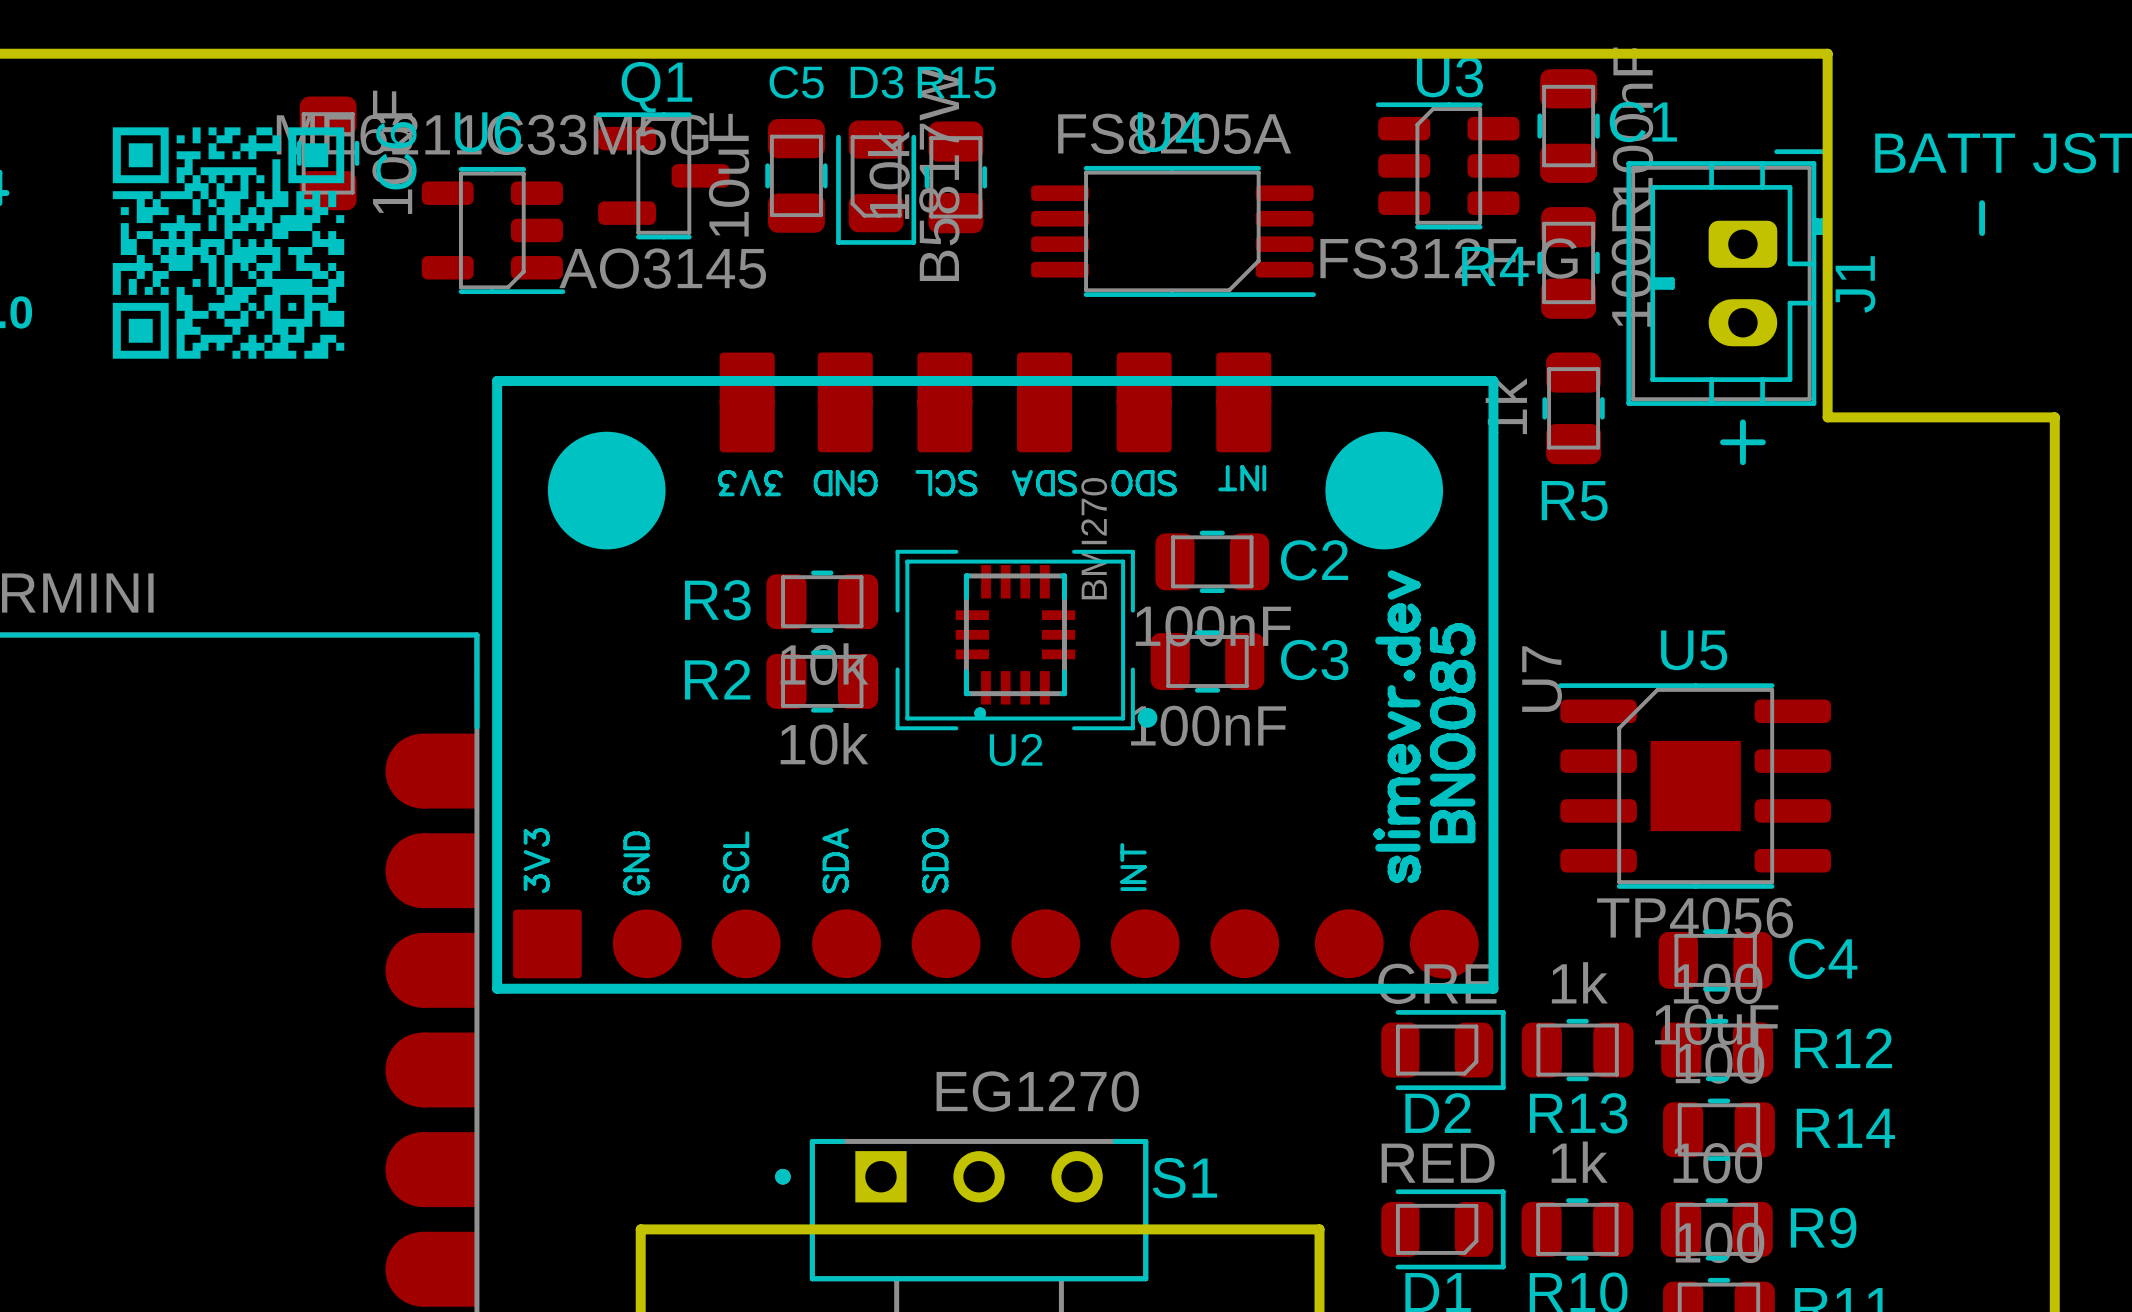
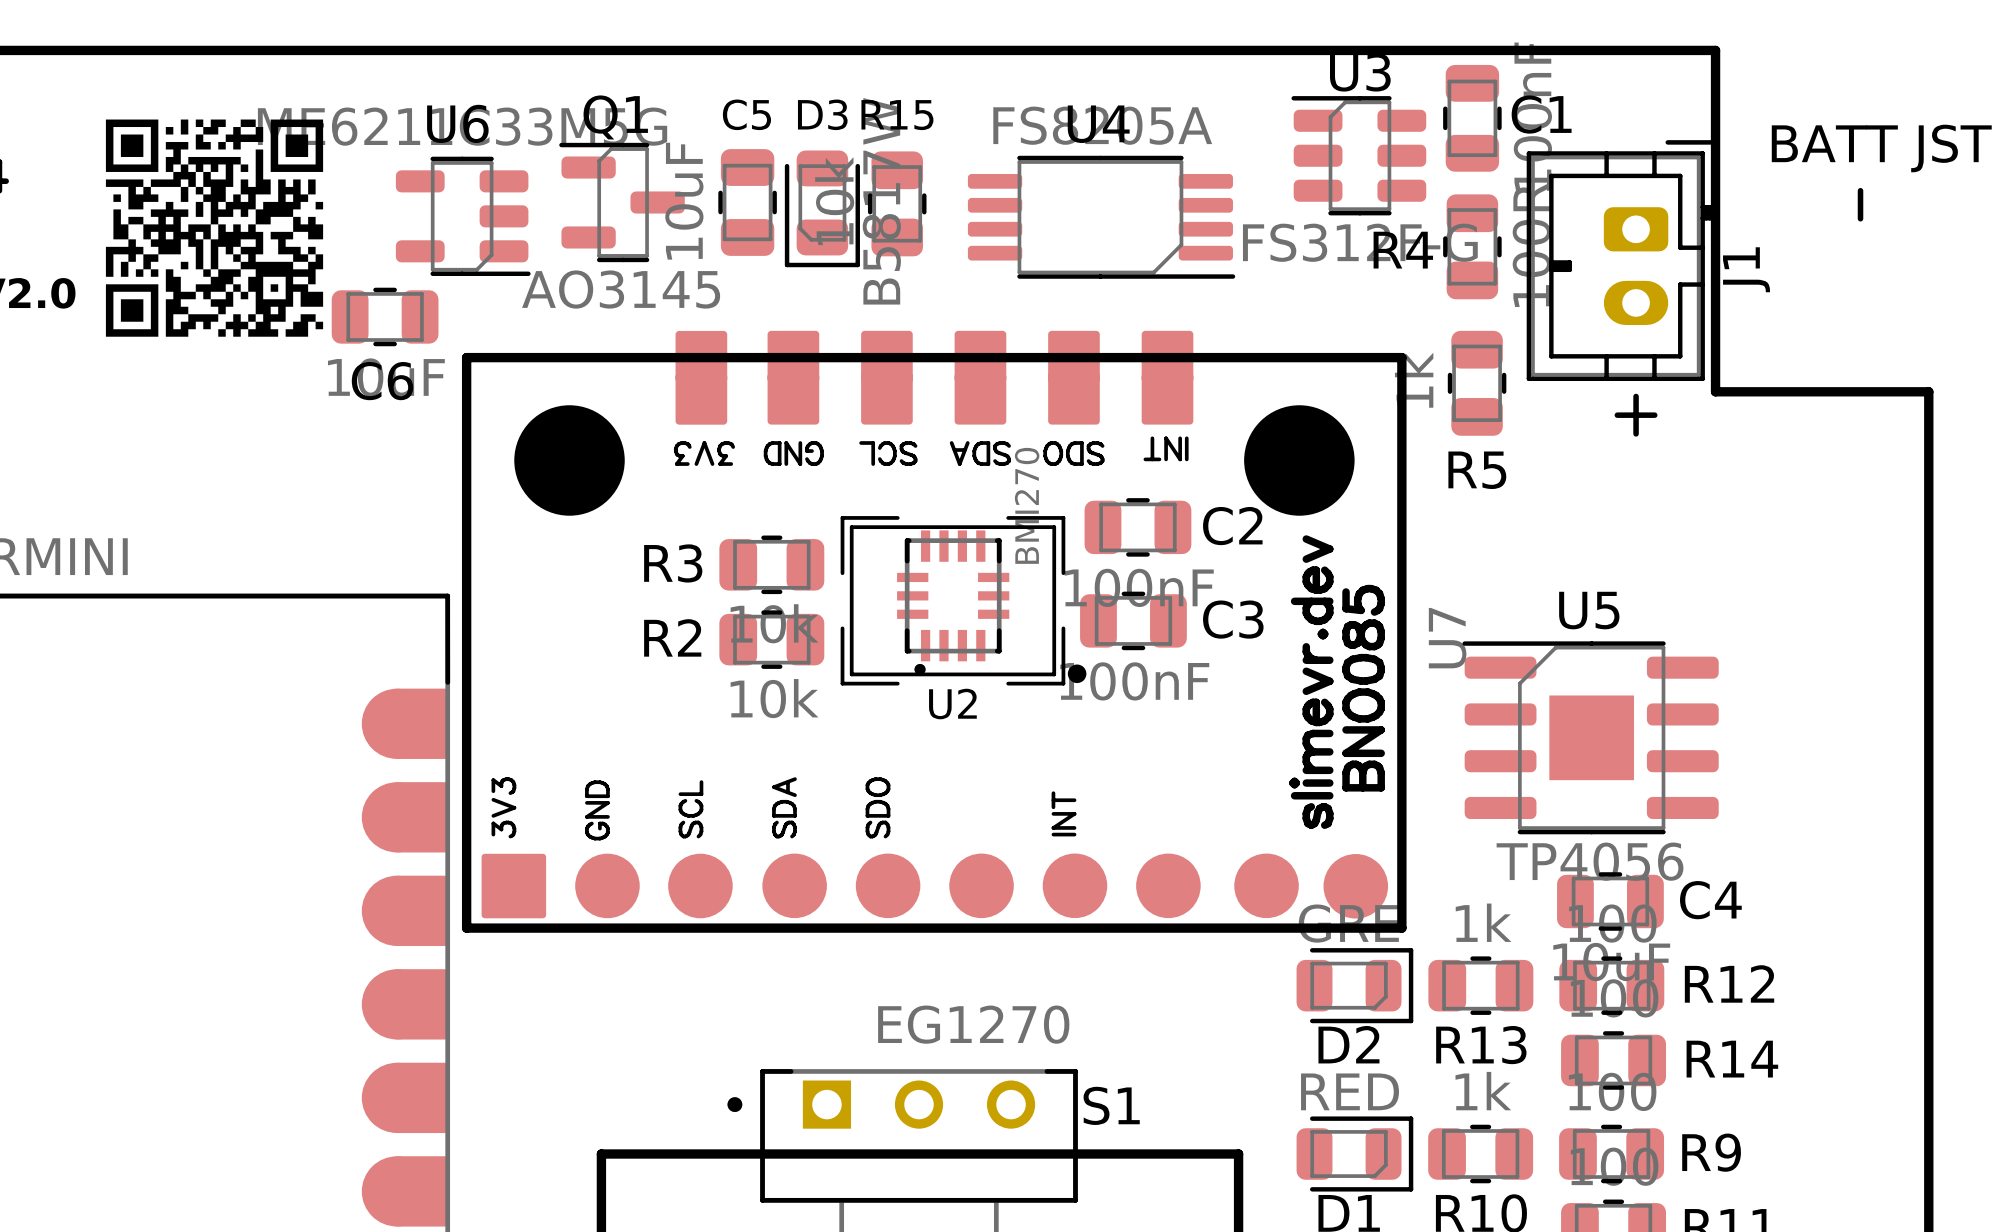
C6 rotation: 0° (328, 153) -> 90° clockwise (385, 316)
C6 position: (328, 153) -> (385, 316)
Q1 position: (662, 175) -> (622, 202)
C5 position: (796, 175) -> (747, 202)
R15 position: (955, 177) -> (897, 203)
D3 position: (876, 182) -> (822, 208)

